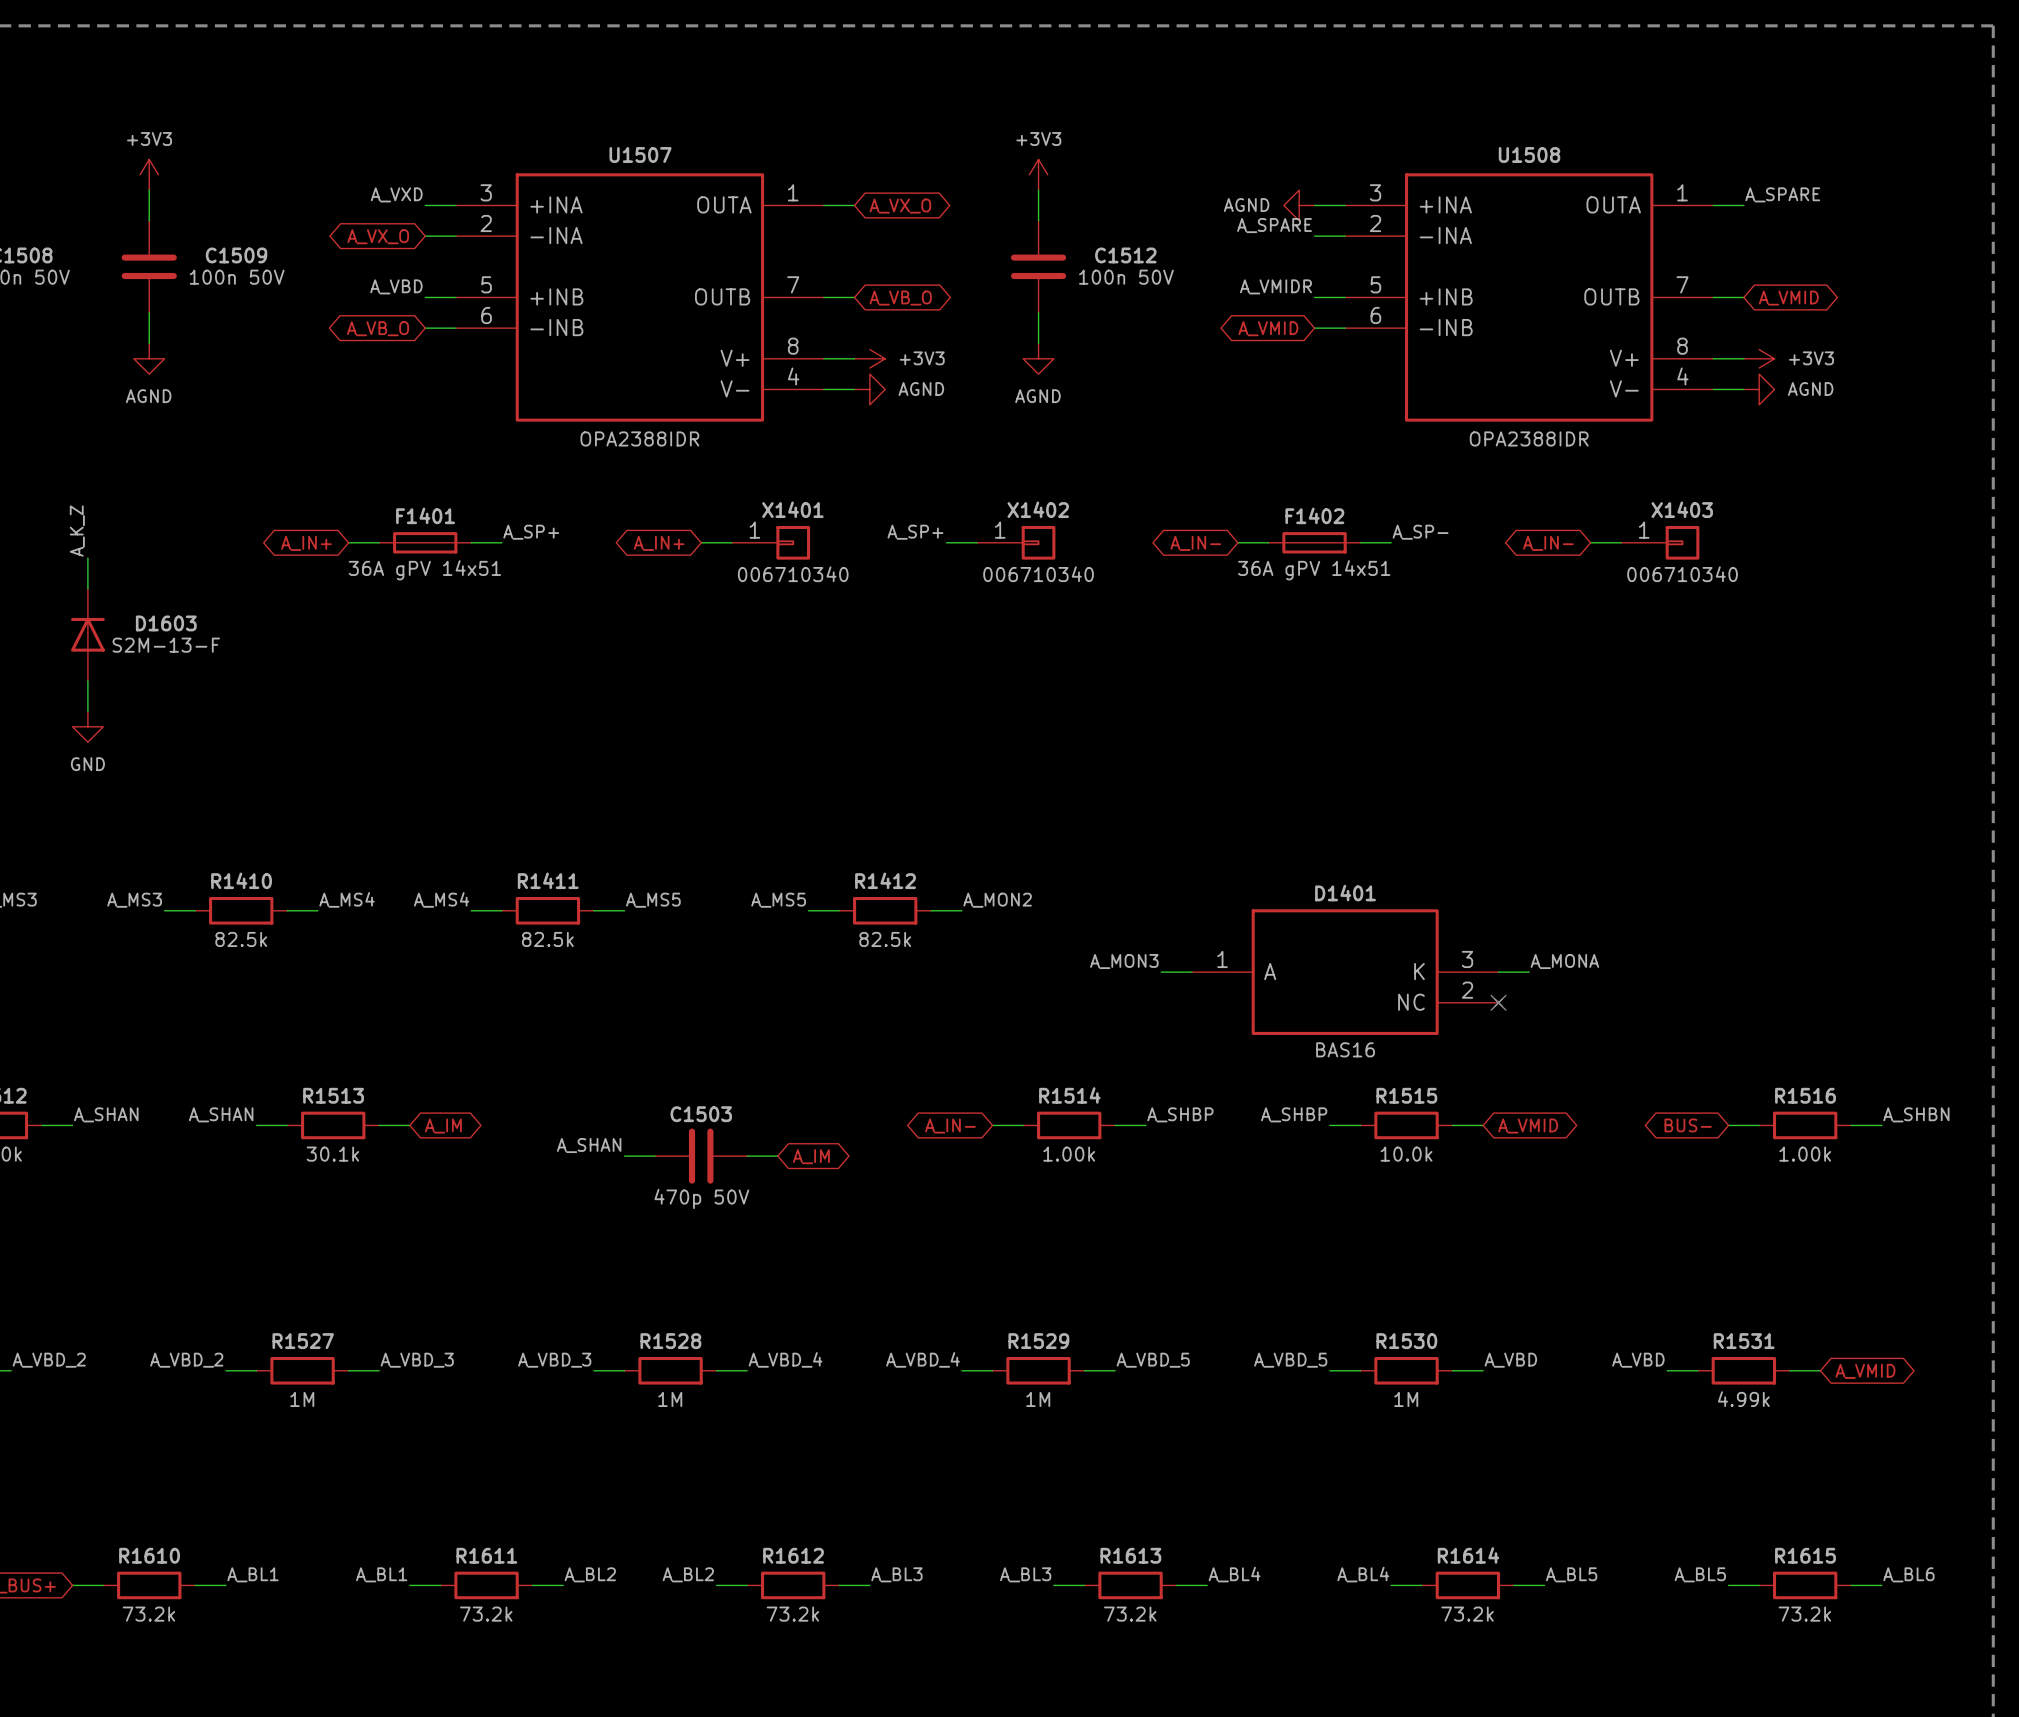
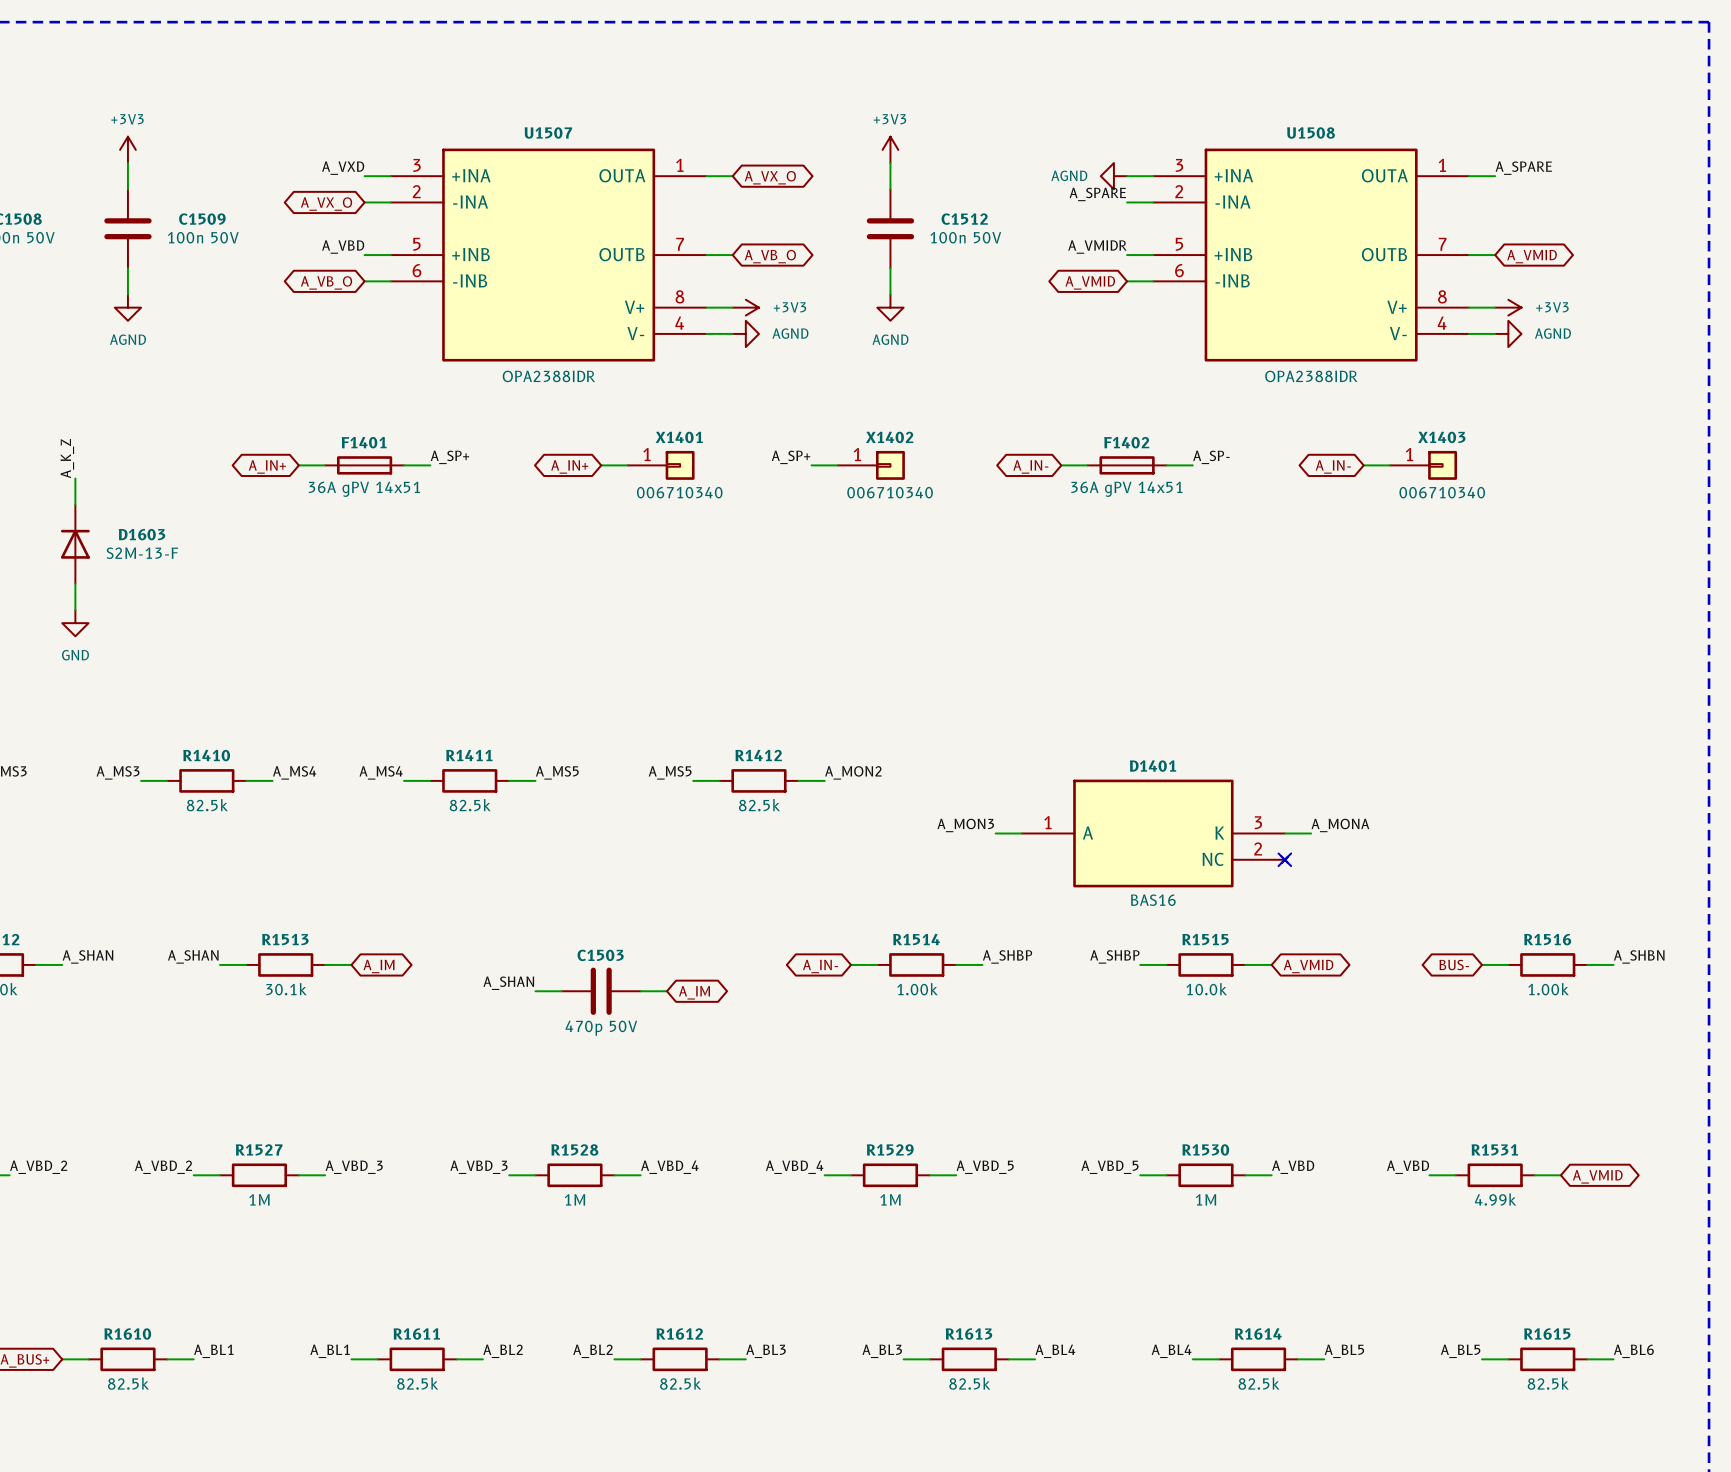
R1610 value: 73.2k (148, 1614) -> 82.5k (128, 1383)
R1611 value: 73.2k (486, 1614) -> 82.5k (417, 1383)
R1612 value: 73.2k (792, 1614) -> 82.5k (680, 1383)
R1613 value: 73.2k (1130, 1614) -> 82.5k (969, 1383)
R1614 value: 73.2k (1467, 1614) -> 82.5k (1259, 1383)
R1615 value: 73.2k (1804, 1614) -> 82.5k (1548, 1383)

